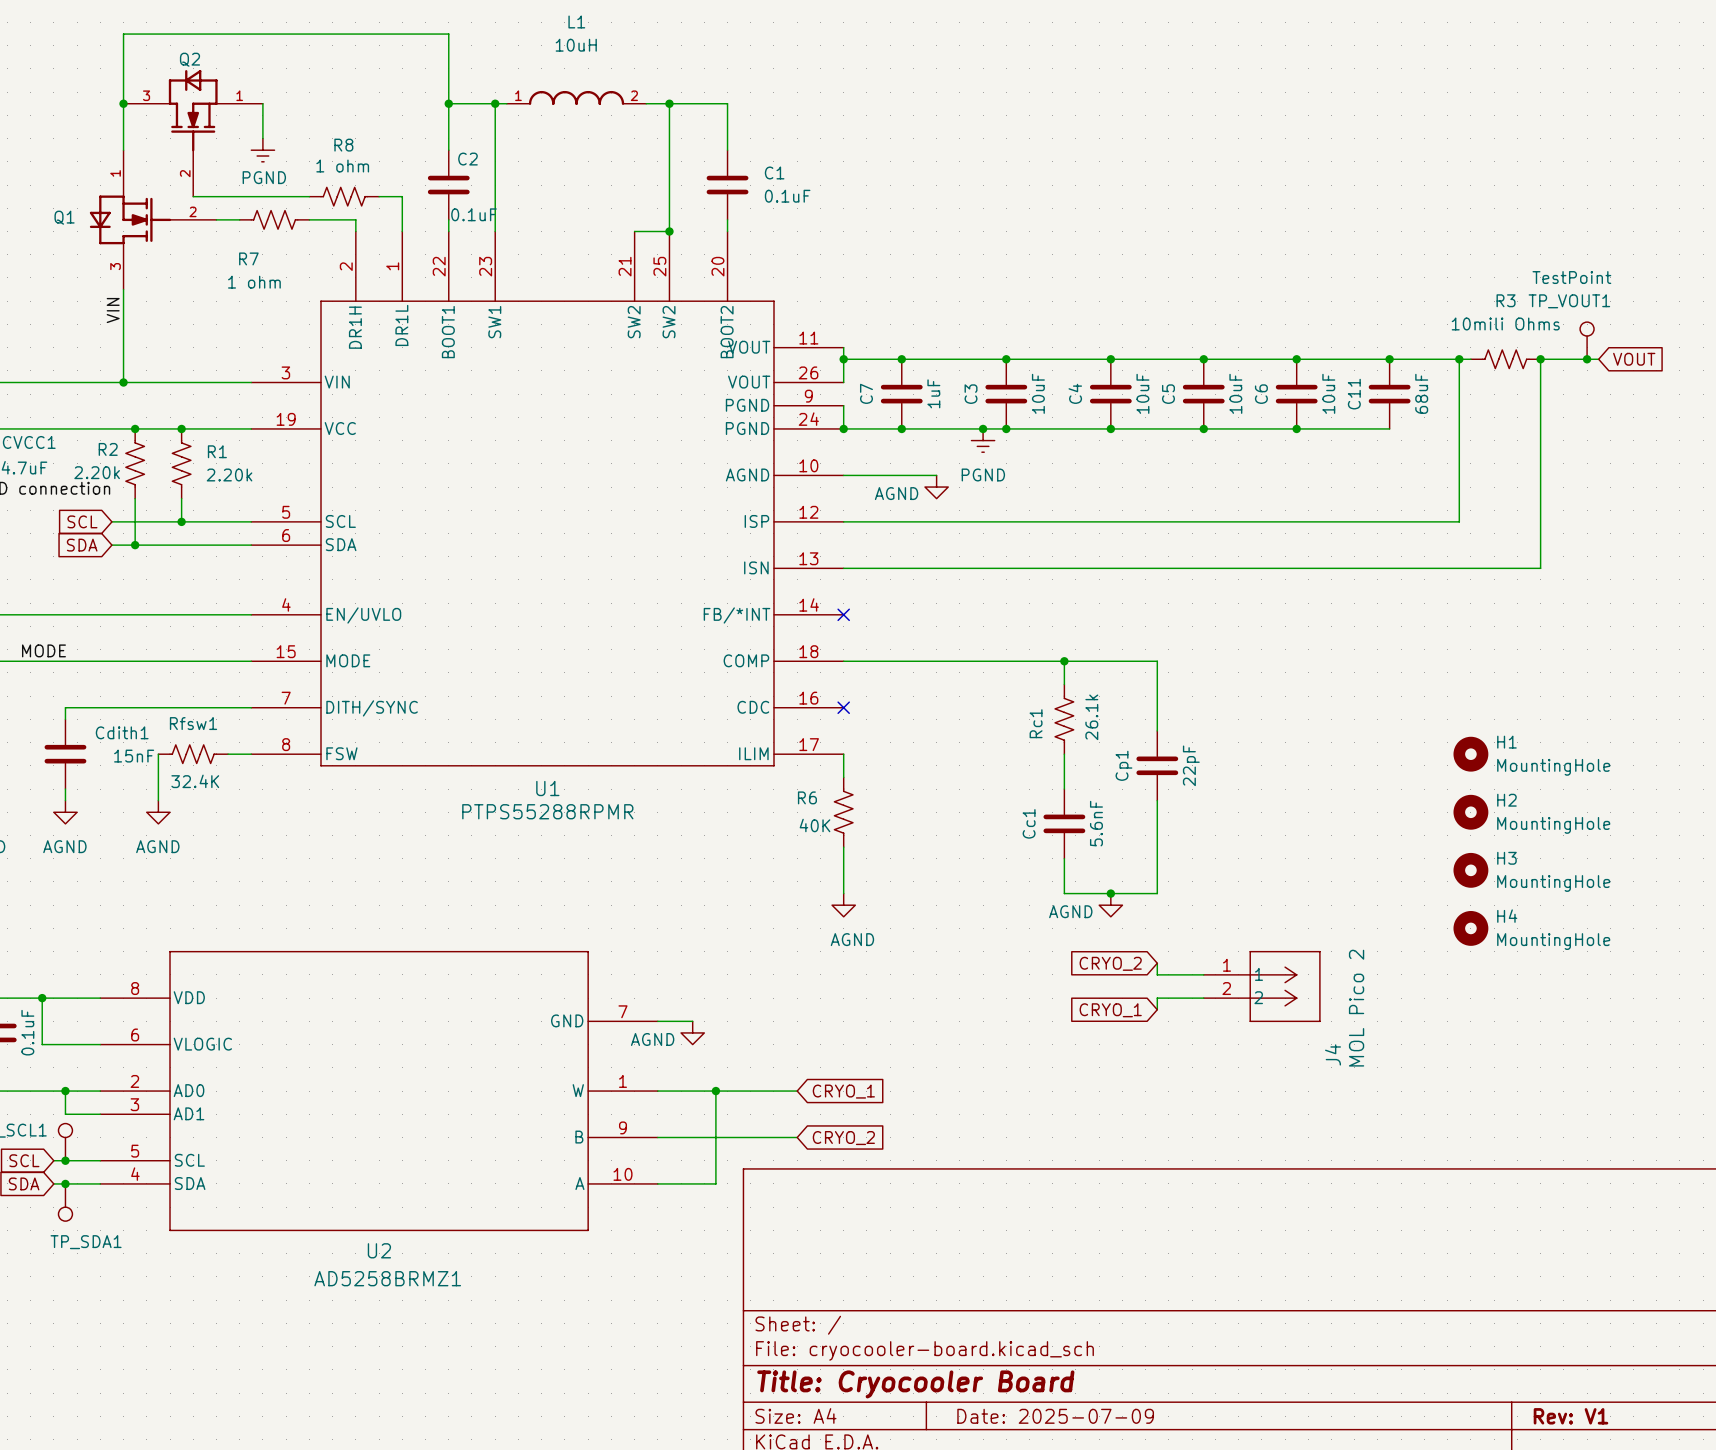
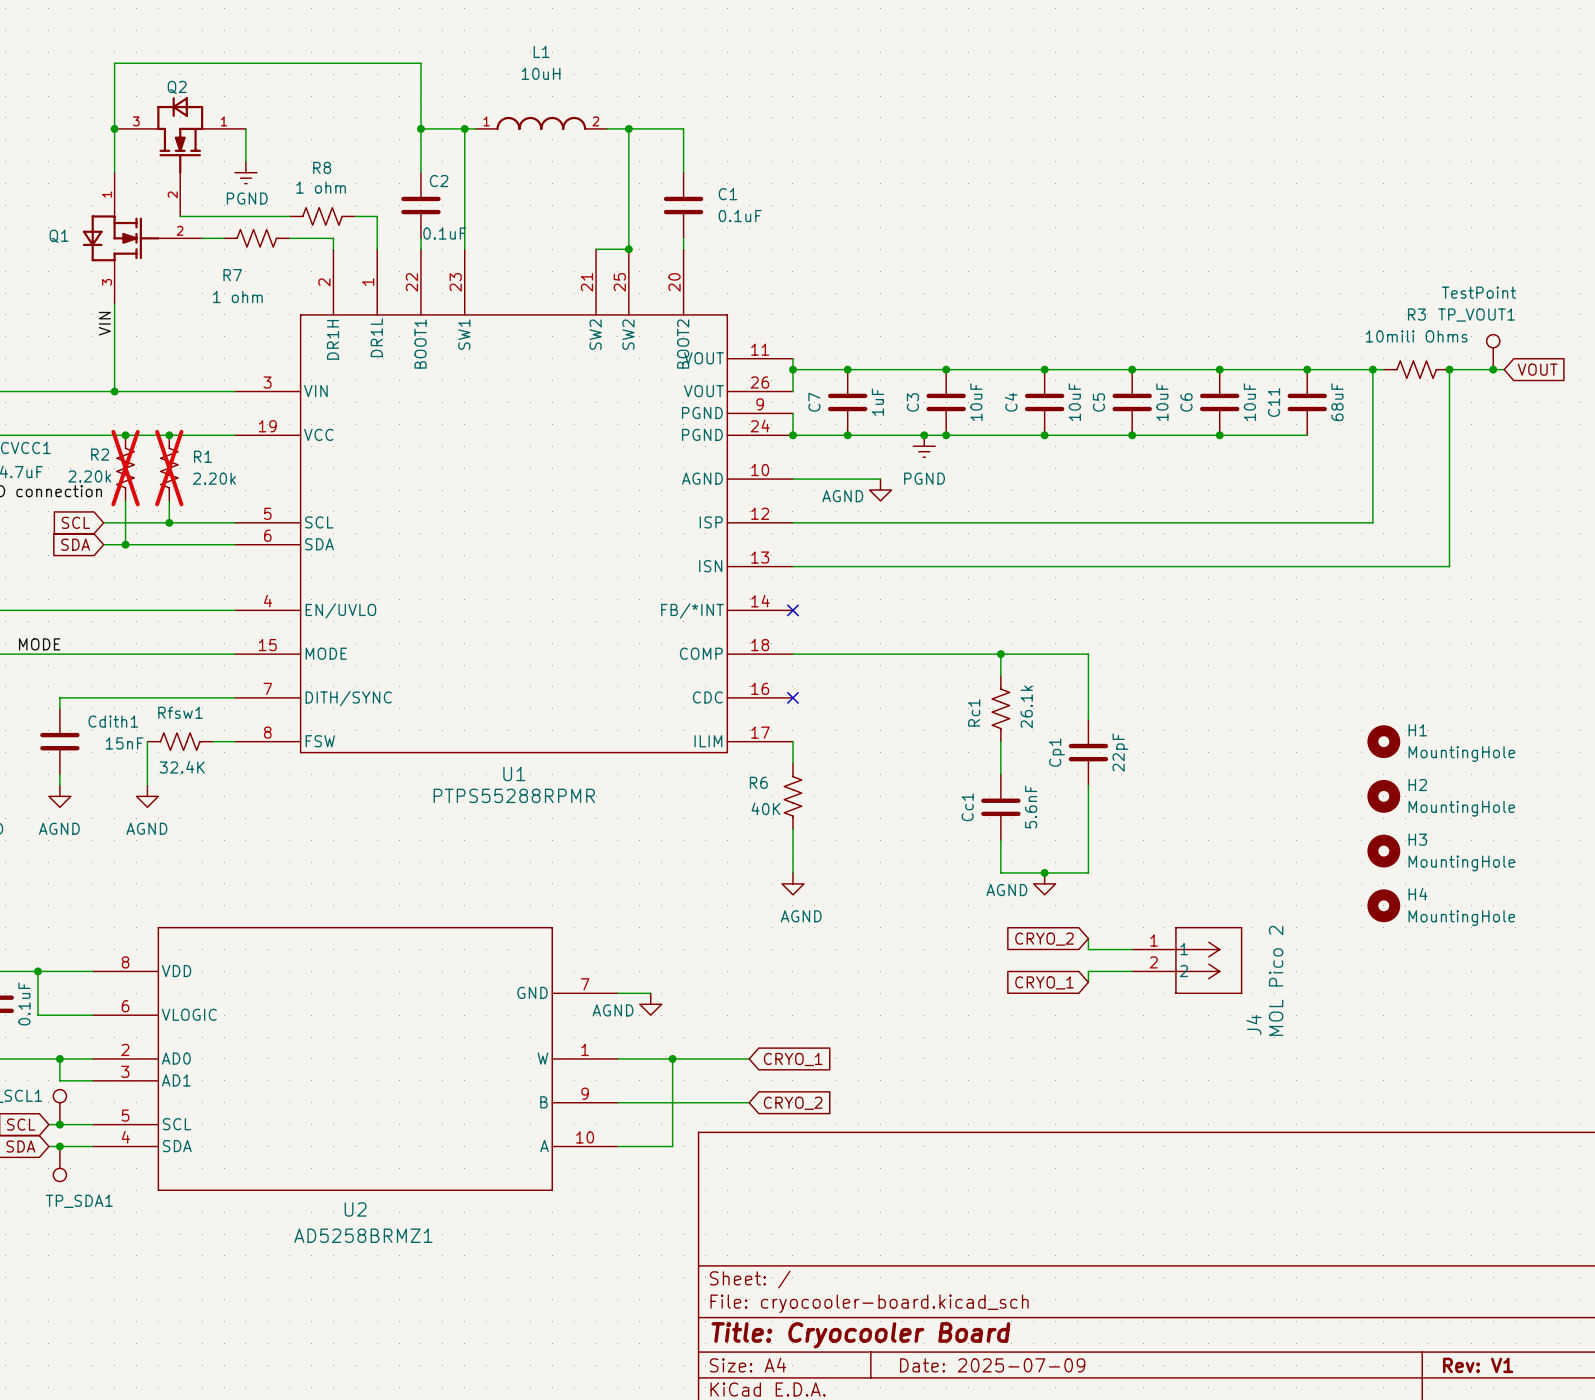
R2 do-not-place cross: none -> (125, 468)
R1 do-not-place cross: none -> (169, 468)

